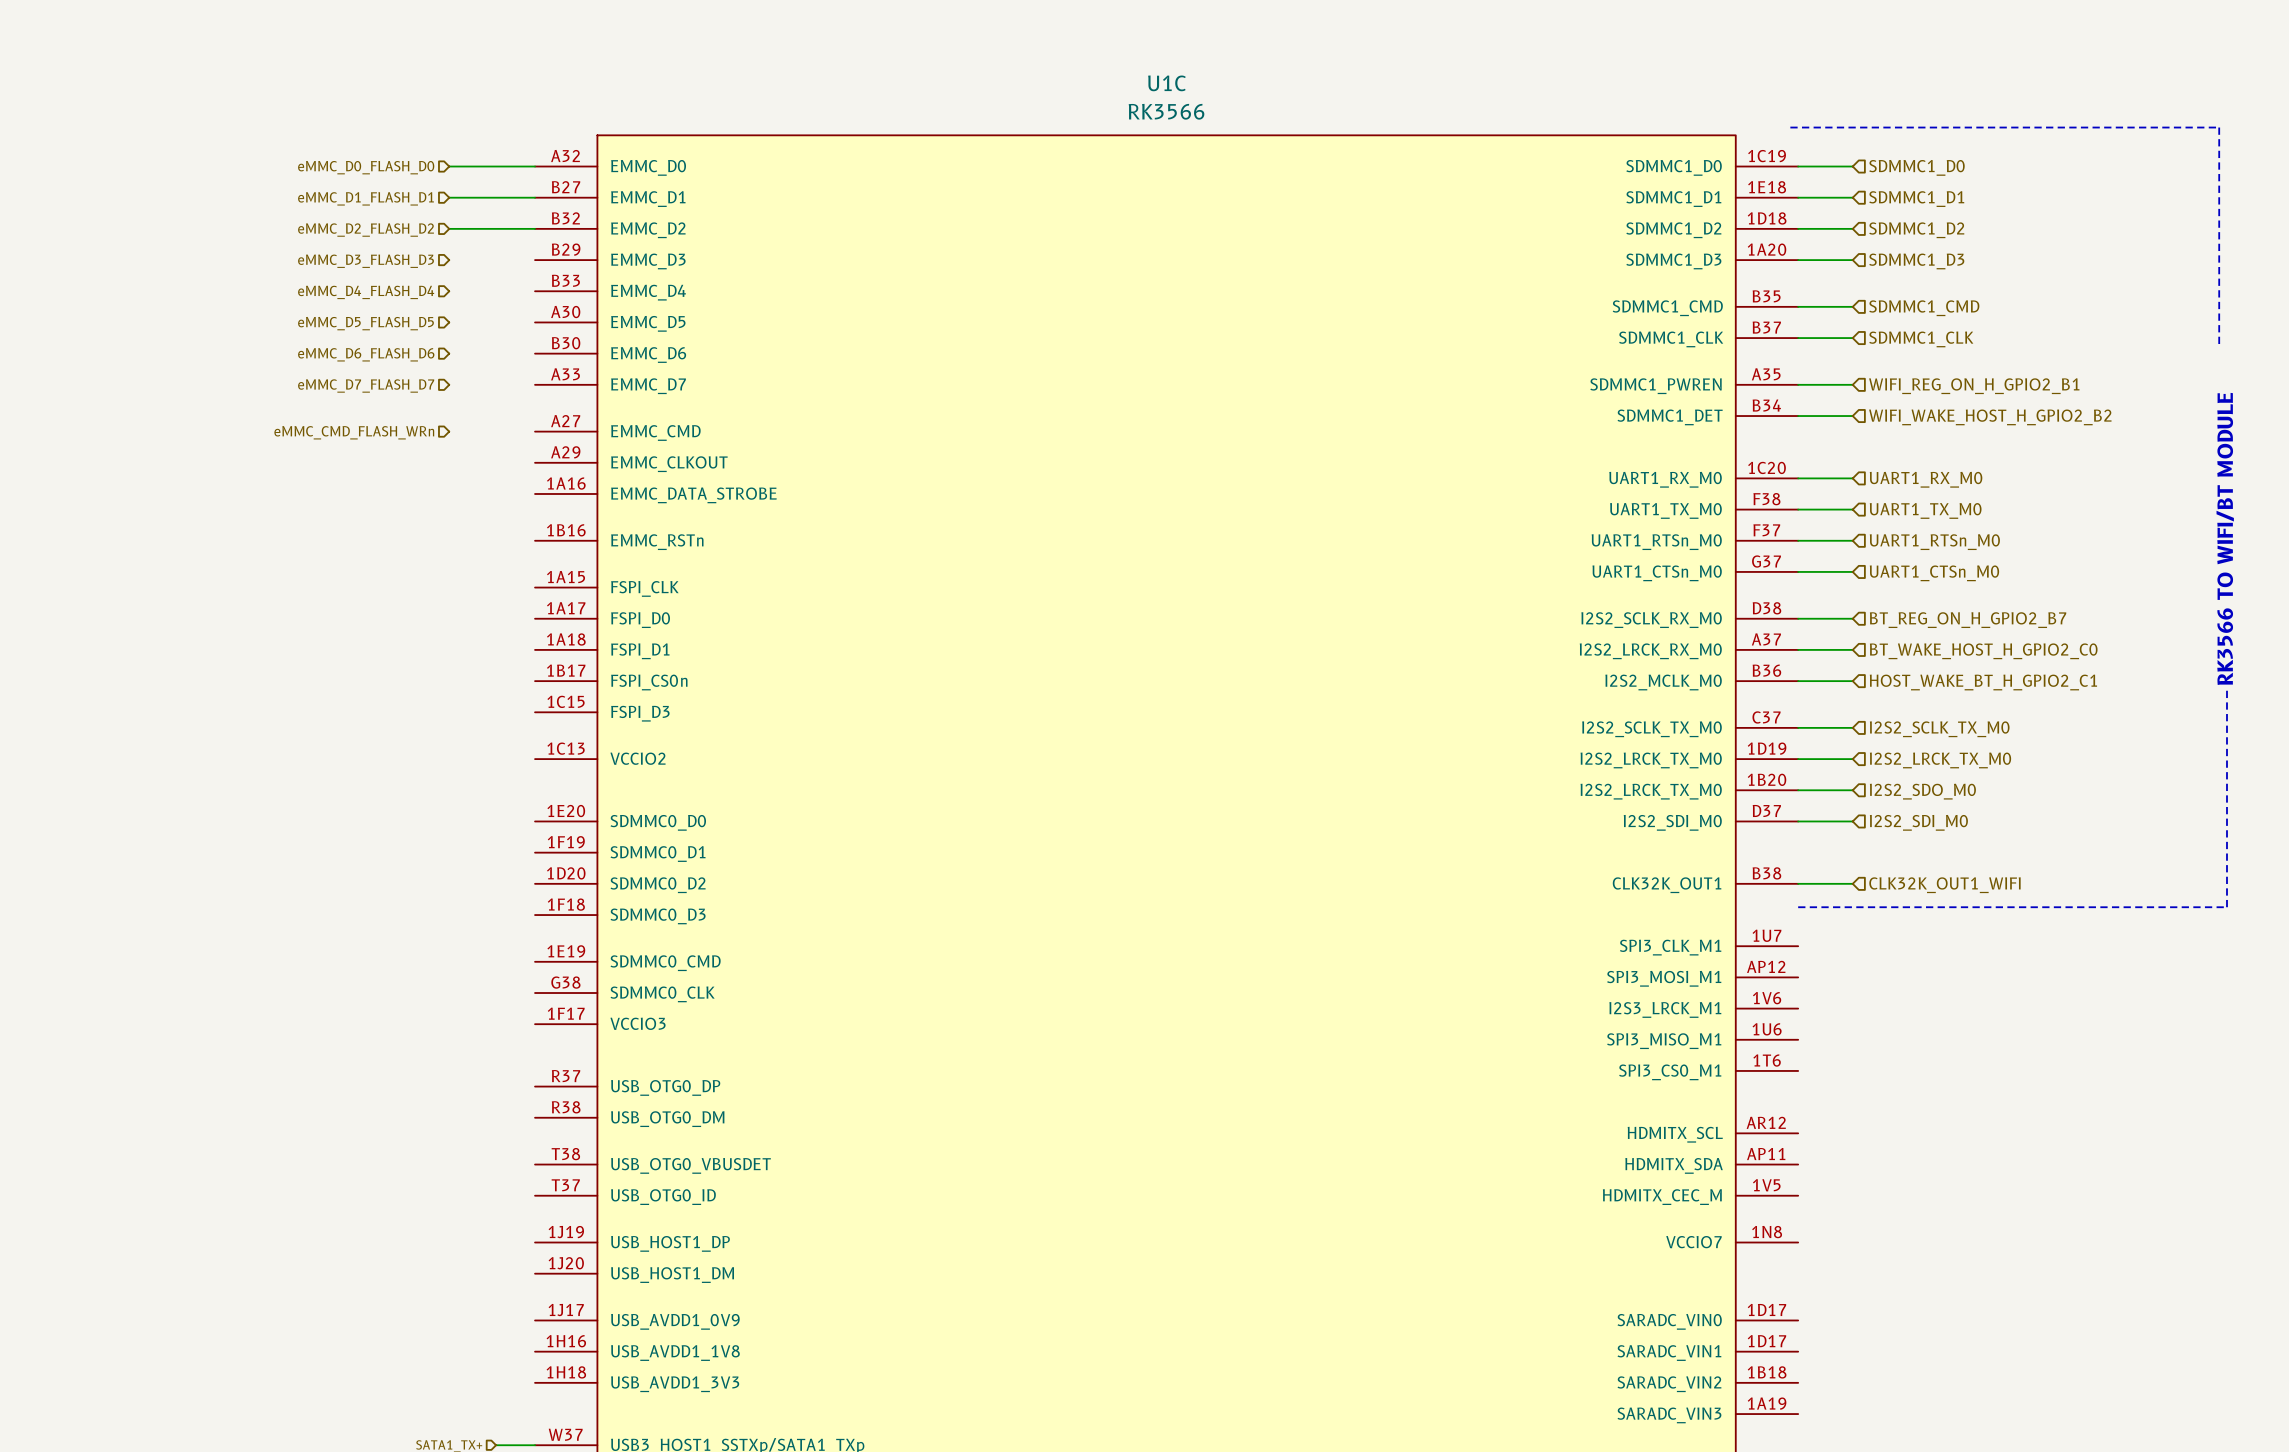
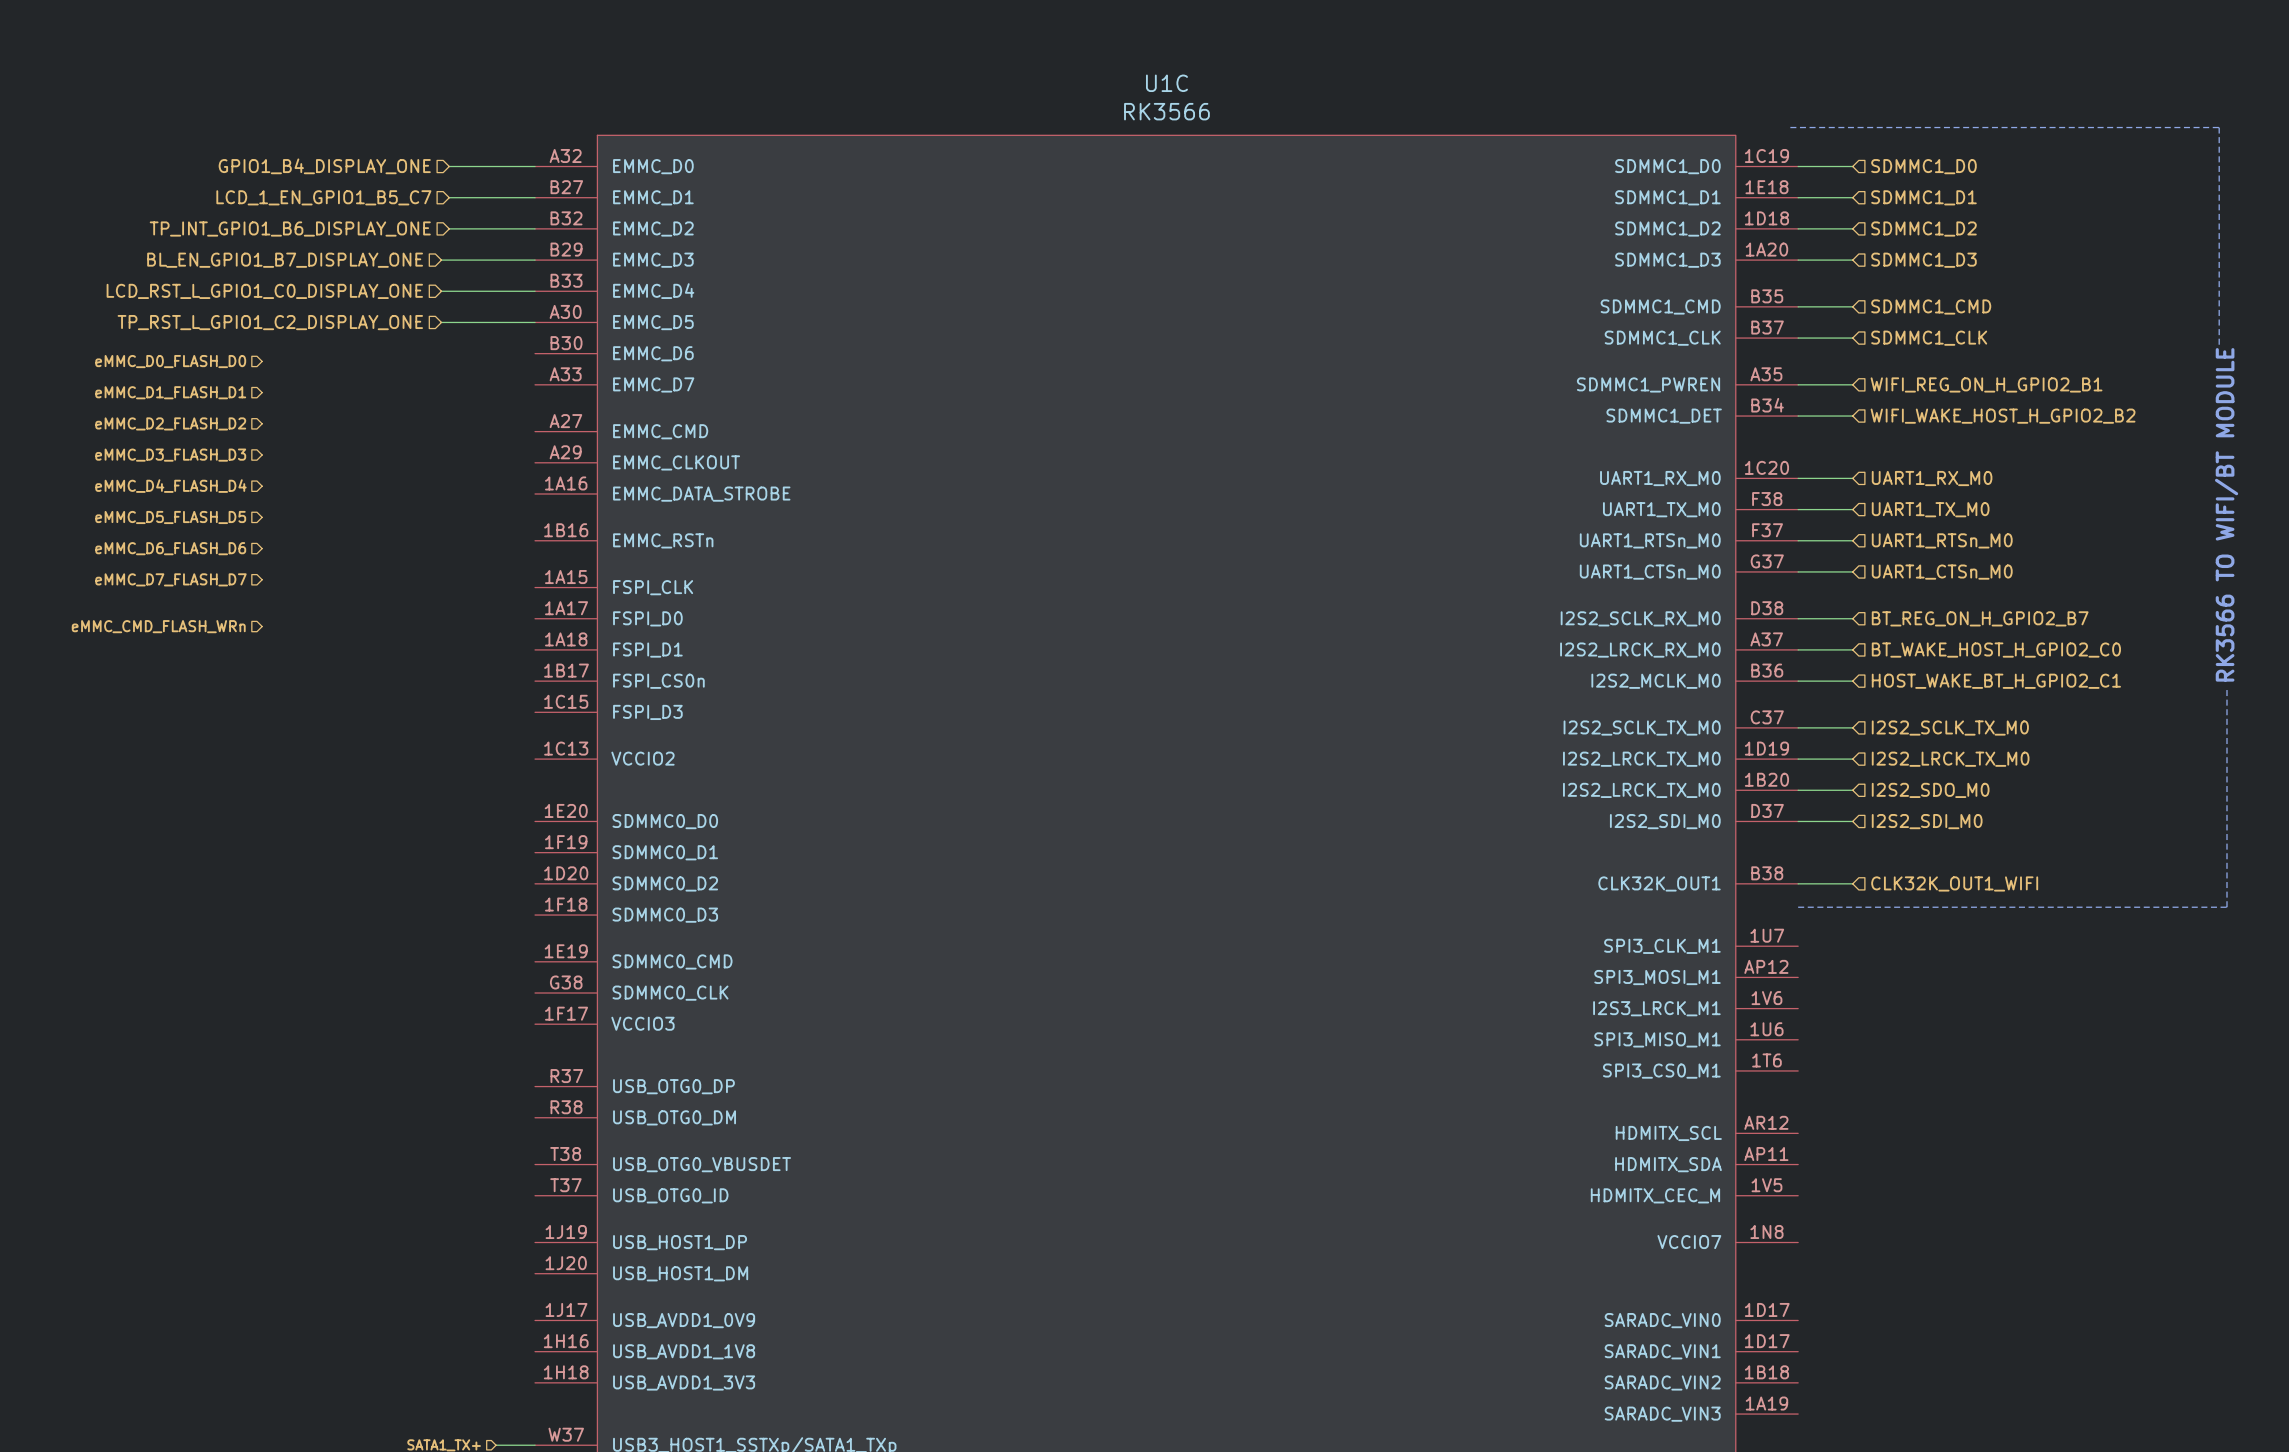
hierarchical label: none -> GPIO1_B4_DISPLAY_ONE (324, 166)
hierarchical label position: eMMC_D0_FLASH_D0 (366, 167) -> eMMC_D0_FLASH_D0 (170, 361)
hierarchical label position: eMMC_D1_FLASH_D1 (365, 198) -> eMMC_D1_FLASH_D1 (170, 392)
hierarchical label: none -> LCD_1_EN_GPIO1_B5_C7 (323, 197)
hierarchical label: none -> TP_INT_GPIO1_B6_DISPLAY_ONE (290, 229)
hierarchical label position: eMMC_D2_FLASH_D2 (366, 230) -> eMMC_D2_FLASH_D2 (170, 423)
wire: none -> (441, 260) (535, 260)
hierarchical label: none -> BL_EN_GPIO1_B7_DISPLAY_ONE (285, 260)
hierarchical label position: eMMC_D3_FLASH_D3 (366, 261) -> eMMC_D3_FLASH_D3 (170, 455)
wire: none -> (441, 291) (535, 291)
hierarchical label: none -> LCD_RST_L_GPIO1_C0_DISPLAY_ONE (264, 291)
hierarchical label position: eMMC_D4_FLASH_D4 (366, 292) -> eMMC_D4_FLASH_D4 (170, 486)
wire: none -> (441, 322) (535, 322)
hierarchical label: none -> TP_RST_L_GPIO1_C2_DISPLAY_ONE (270, 322)
hierarchical label position: eMMC_D5_FLASH_D5 (365, 323) -> eMMC_D5_FLASH_D5 (170, 517)
hierarchical label position: eMMC_D6_FLASH_D6 (366, 354) -> eMMC_D6_FLASH_D6 (170, 548)
hierarchical label position: eMMC_D7_FLASH_D7 (366, 385) -> eMMC_D7_FLASH_D7 (170, 579)
hierarchical label position: eMMC_CMD_FLASH_WRn (354, 432) -> eMMC_CMD_FLASH_WRn (158, 626)

